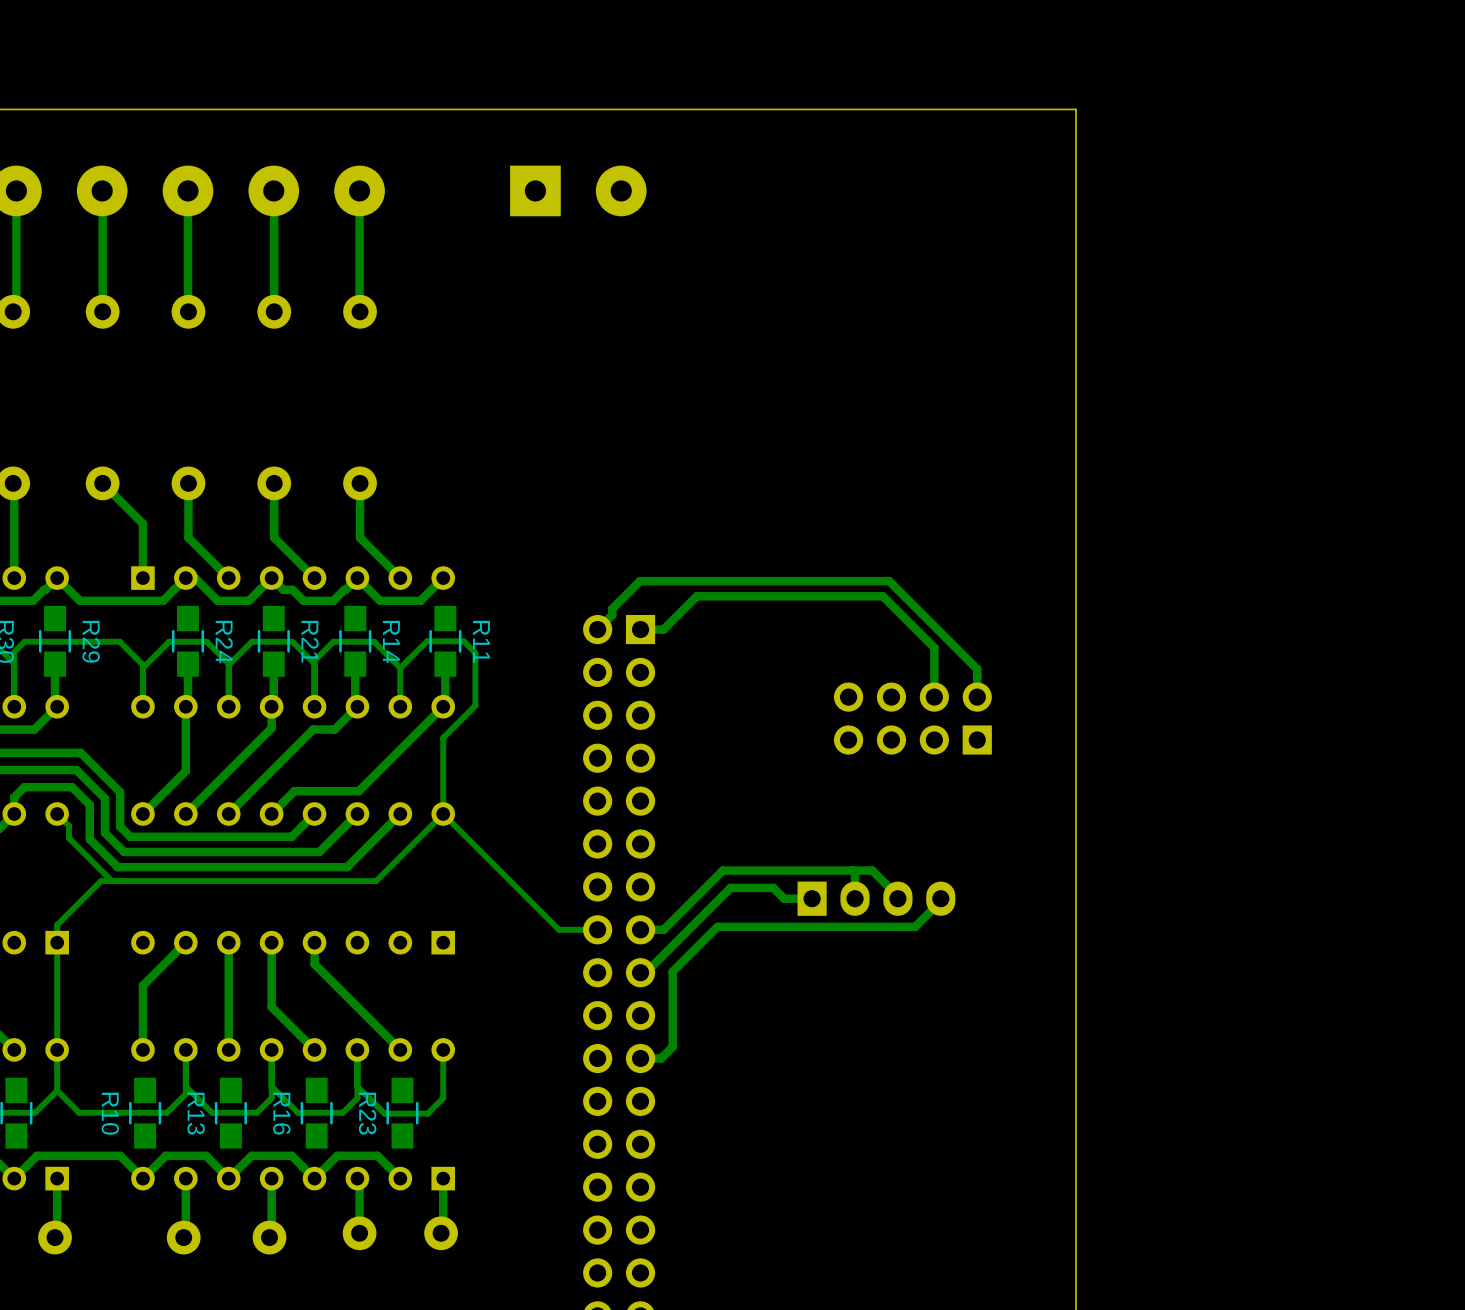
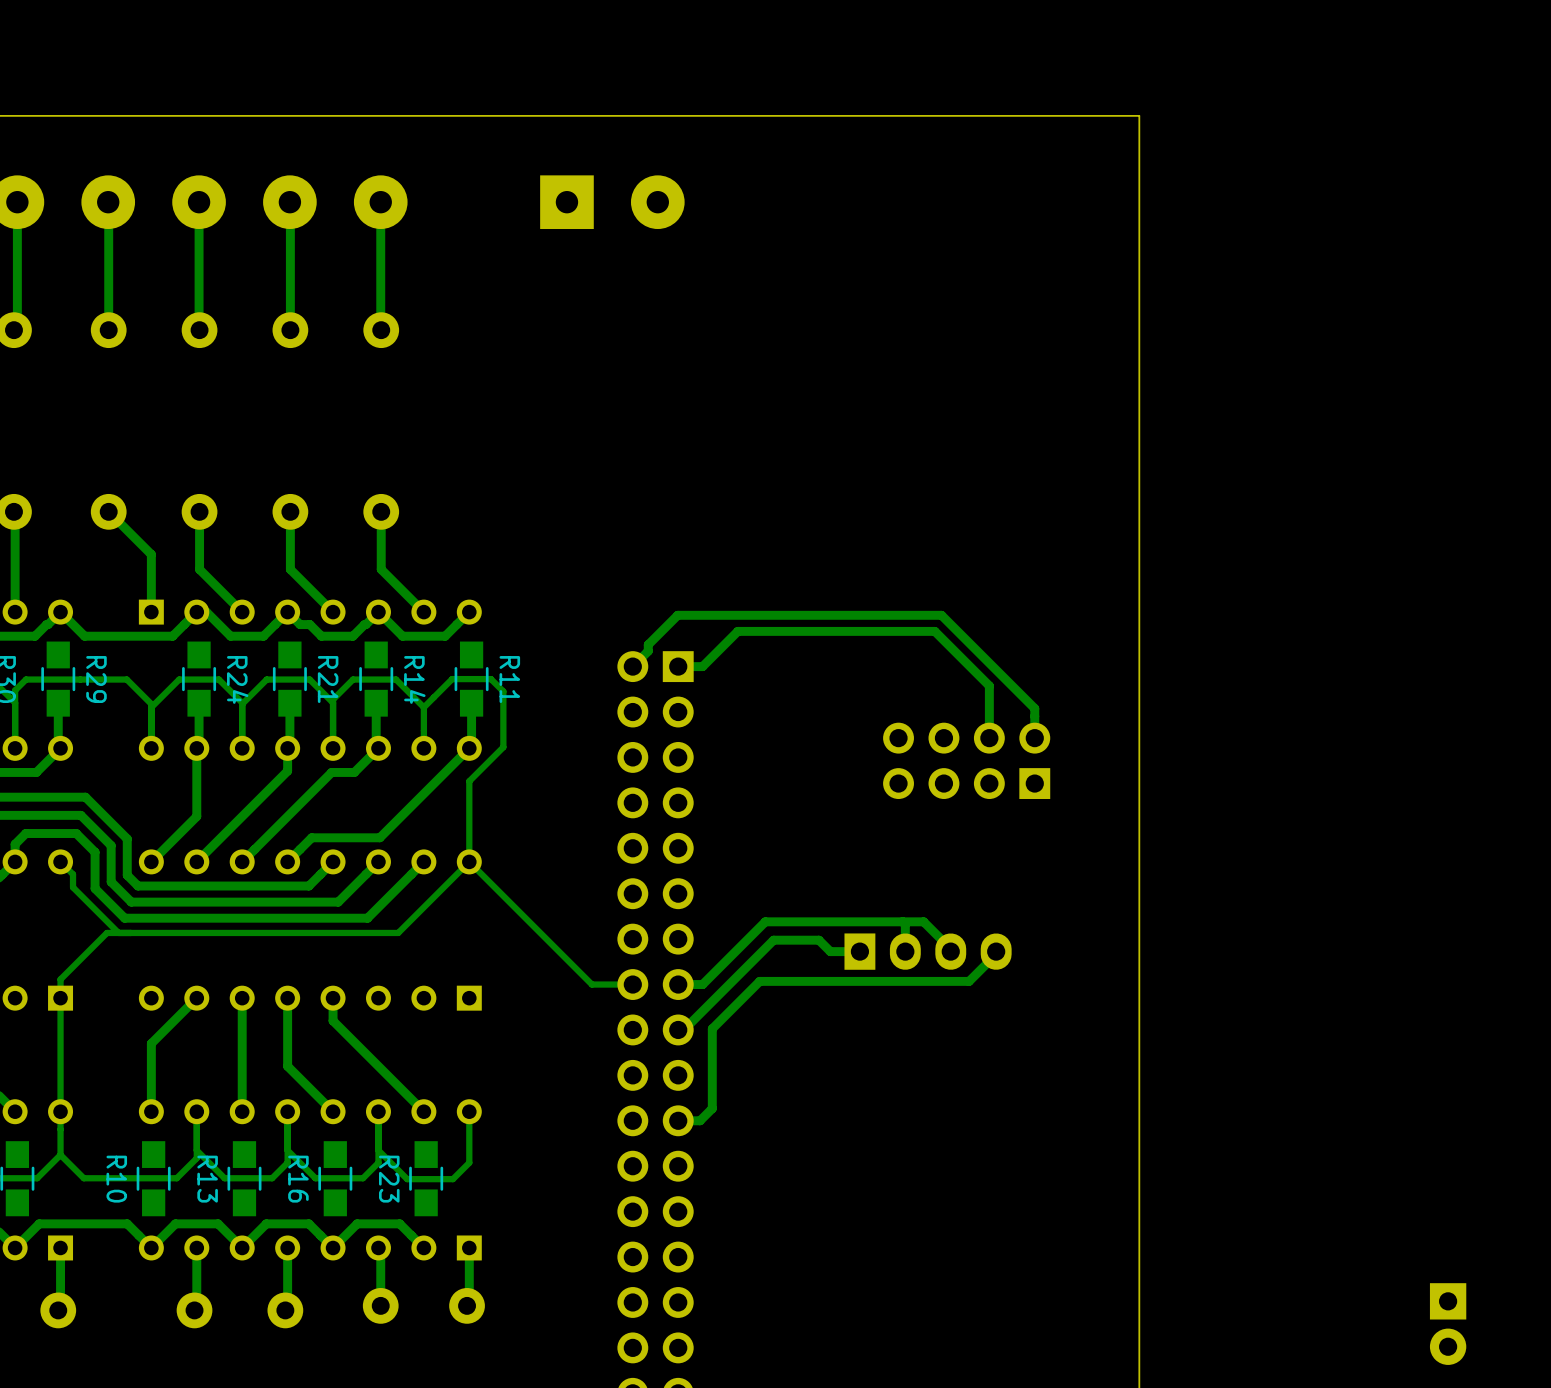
part: none -> (1448, 1324)

